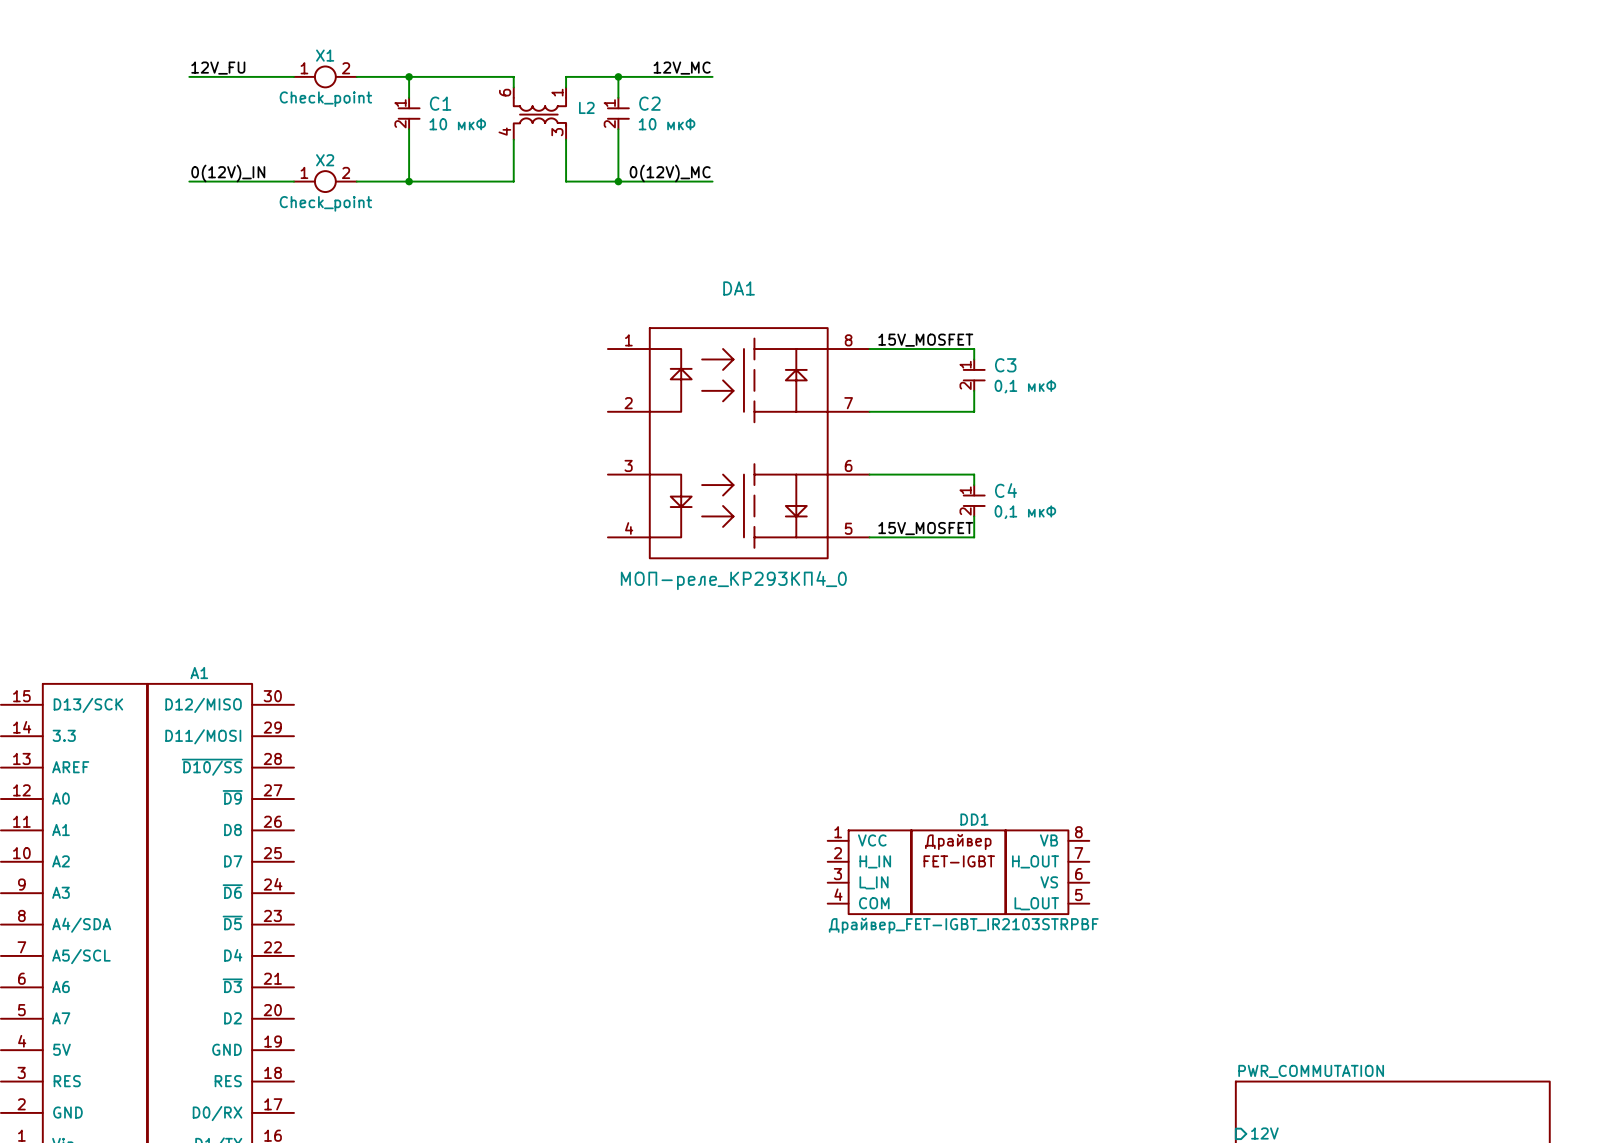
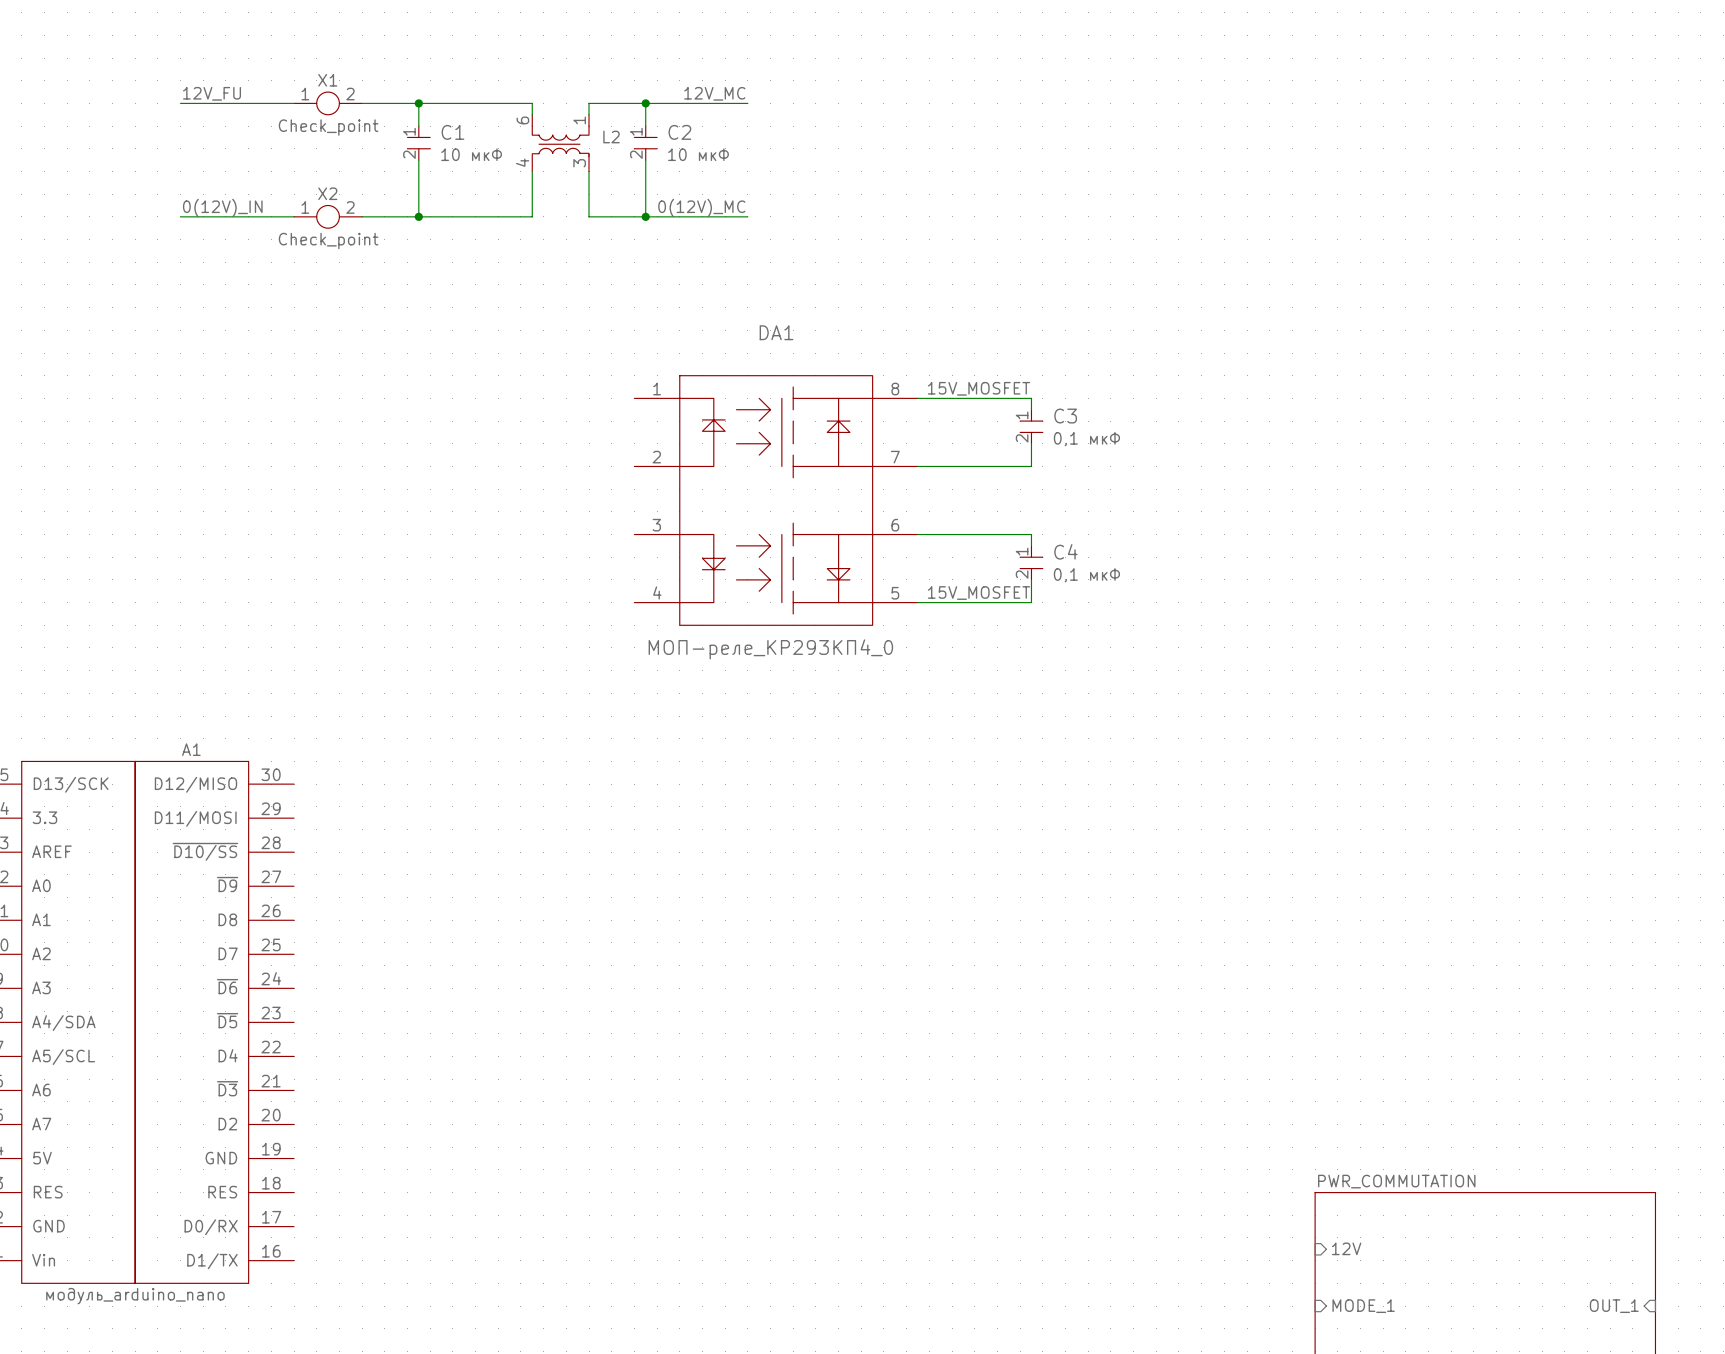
DD1: Драйвер_FET-IGBT_IR2103STRPBF (958, 872) -> none

